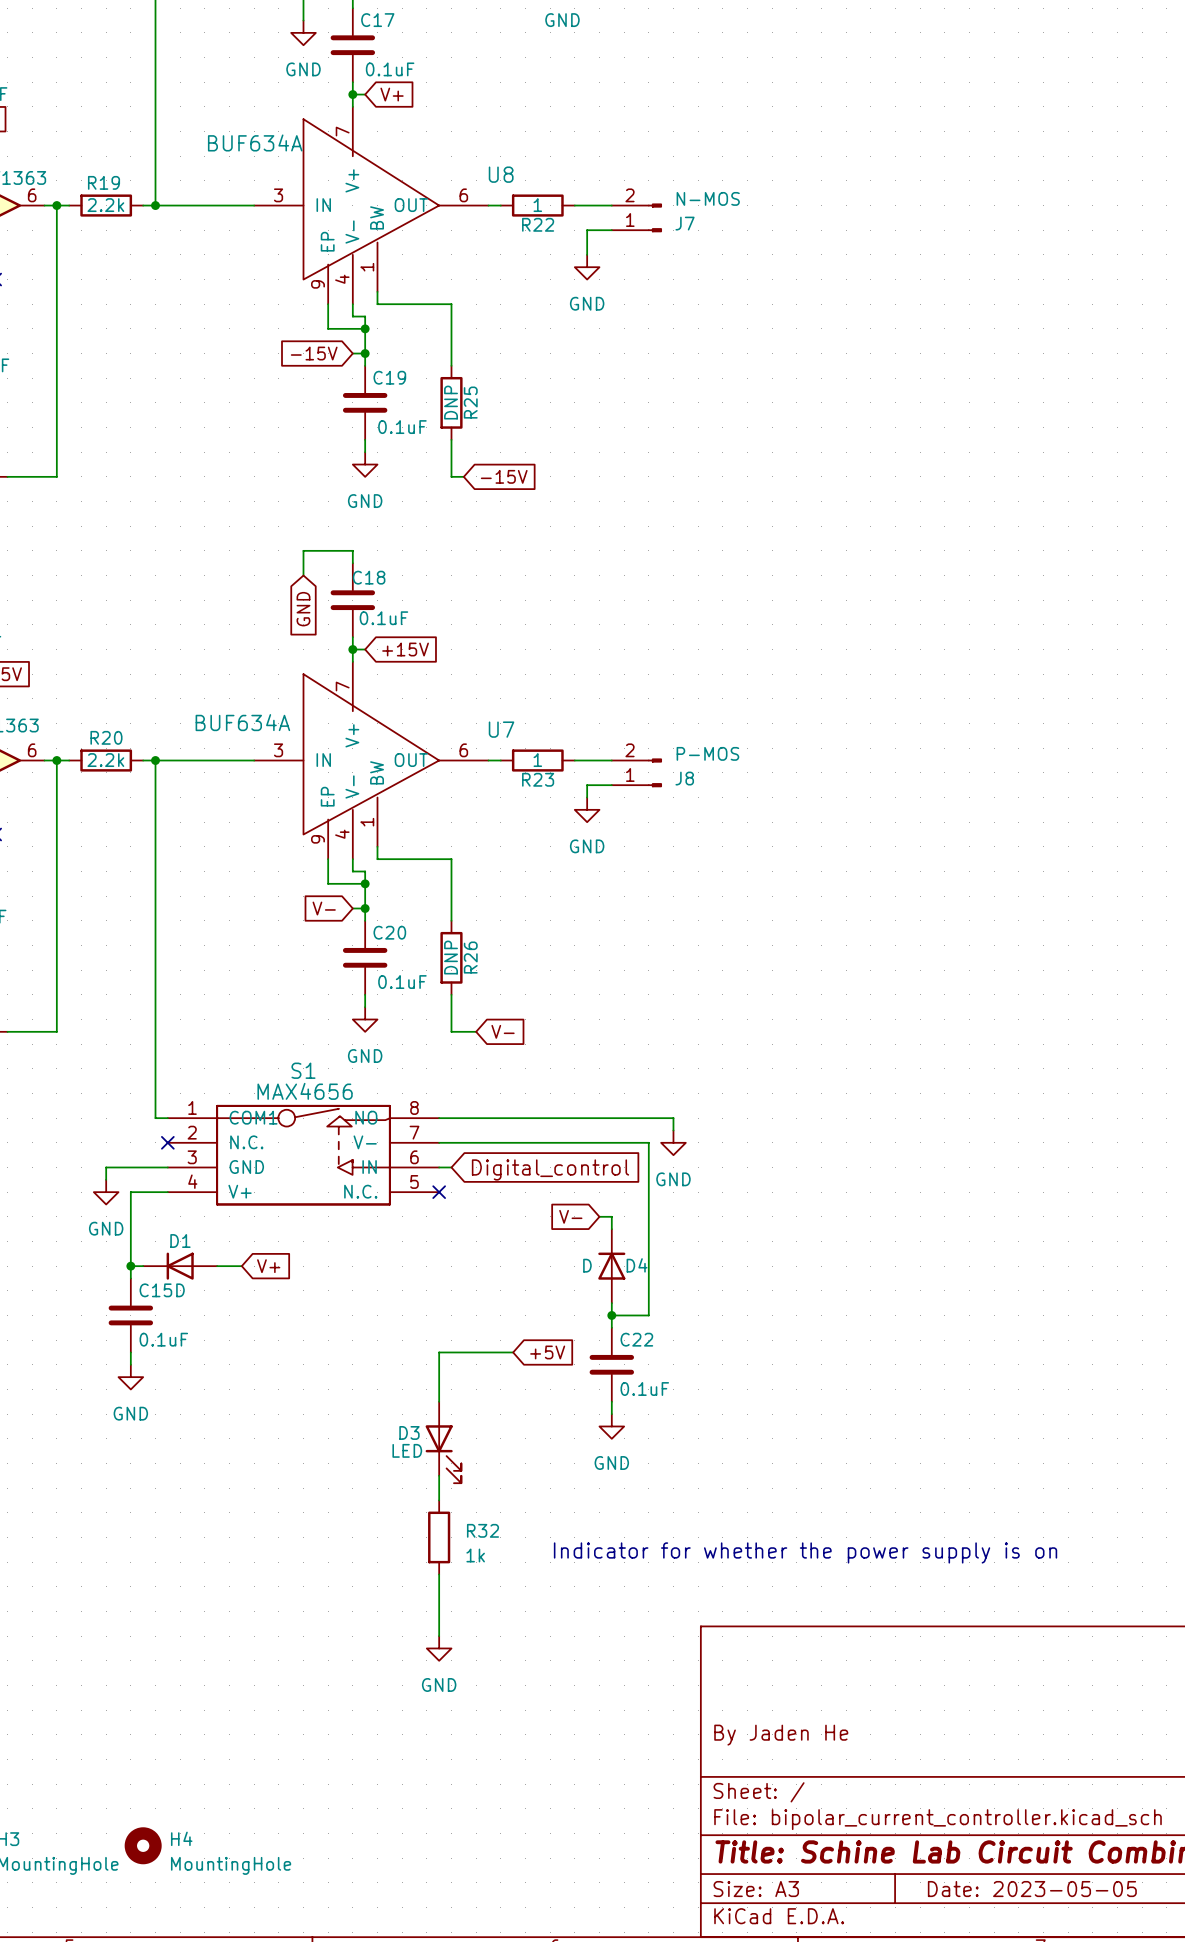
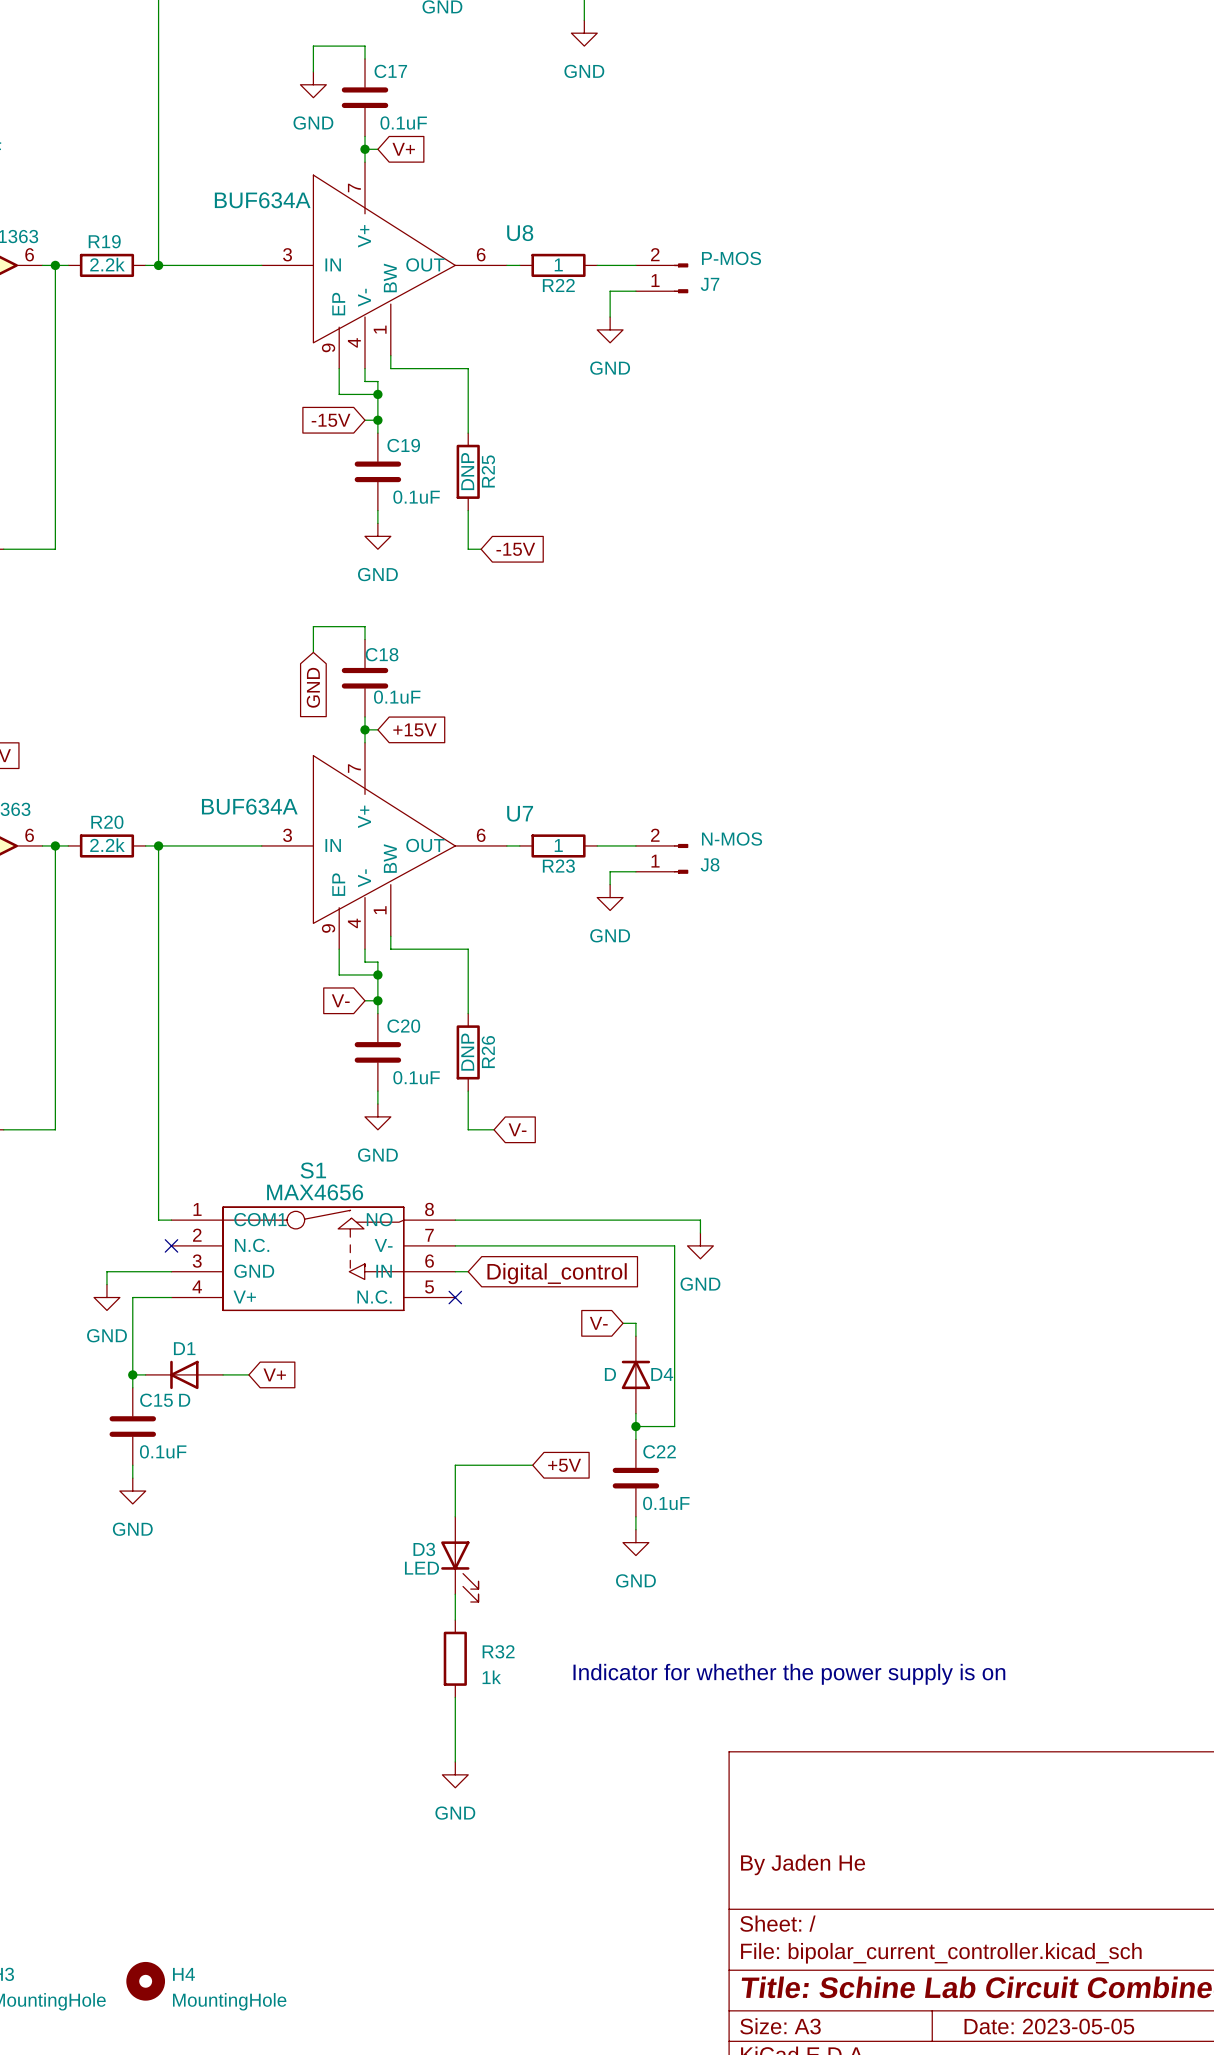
J7 value: N-MOS (708, 198) -> P-MOS (731, 258)
J8 value: P-MOS (707, 753) -> N-MOS (732, 839)

